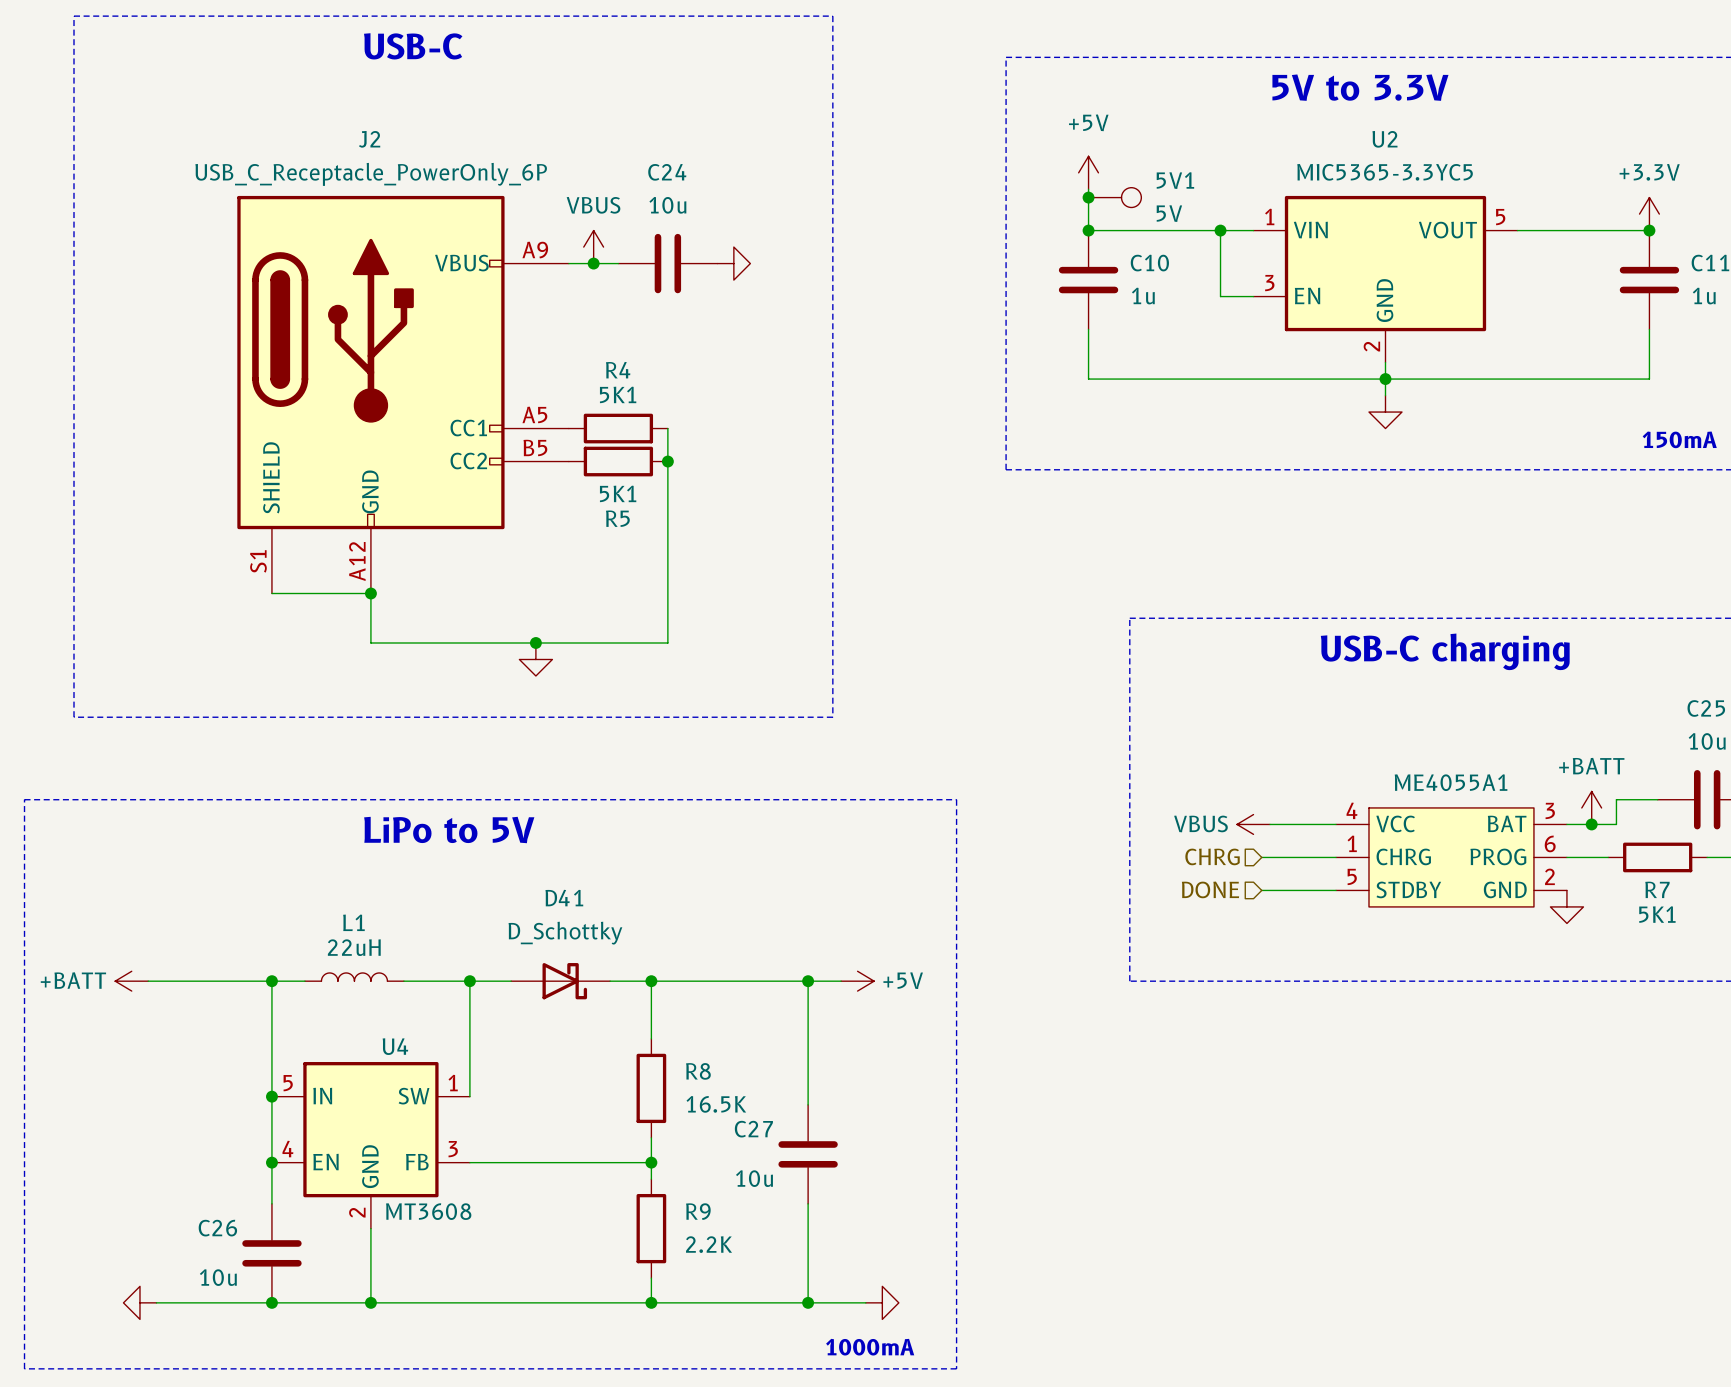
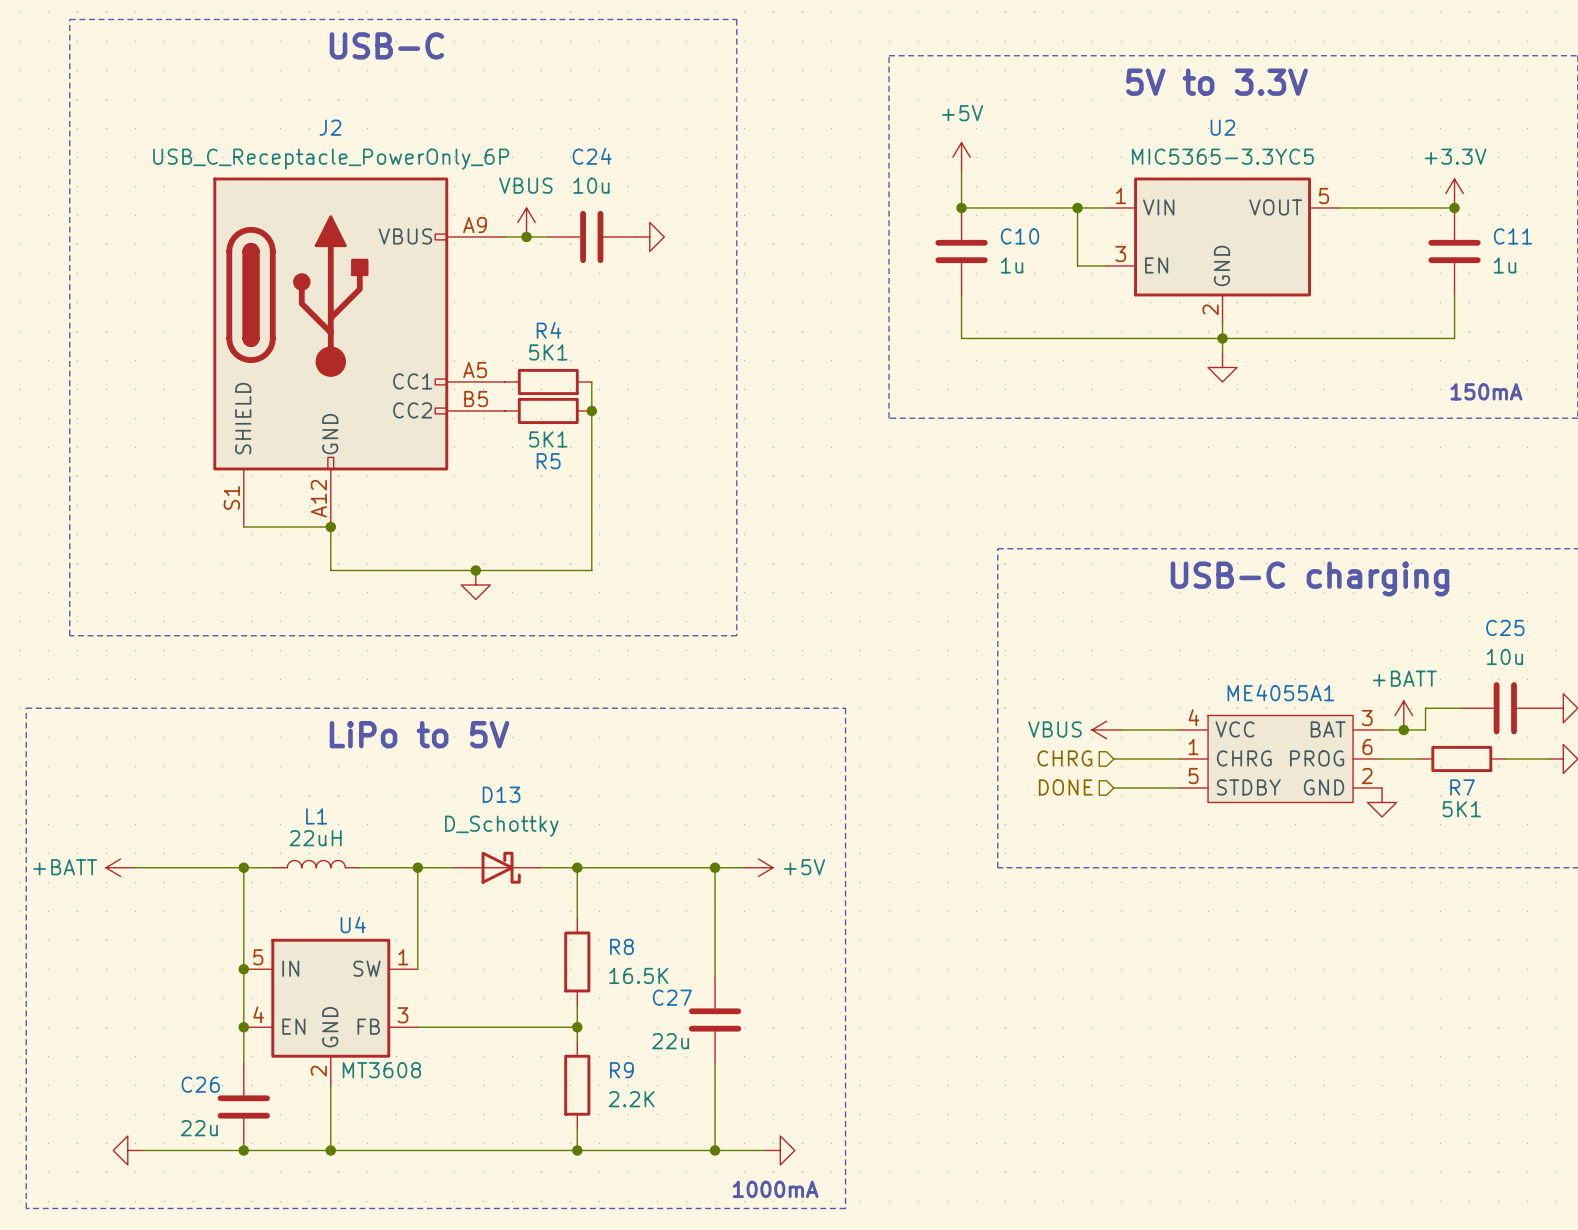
junction: (1088, 197) -> none
5V1: 5V (1114, 197) -> none
D41 name: D41 (564, 898) -> D13 (501, 794)
C27 value: 10u (754, 1178) -> 22u (670, 1041)
C26 value: 10u (218, 1277) -> 22u (199, 1128)

